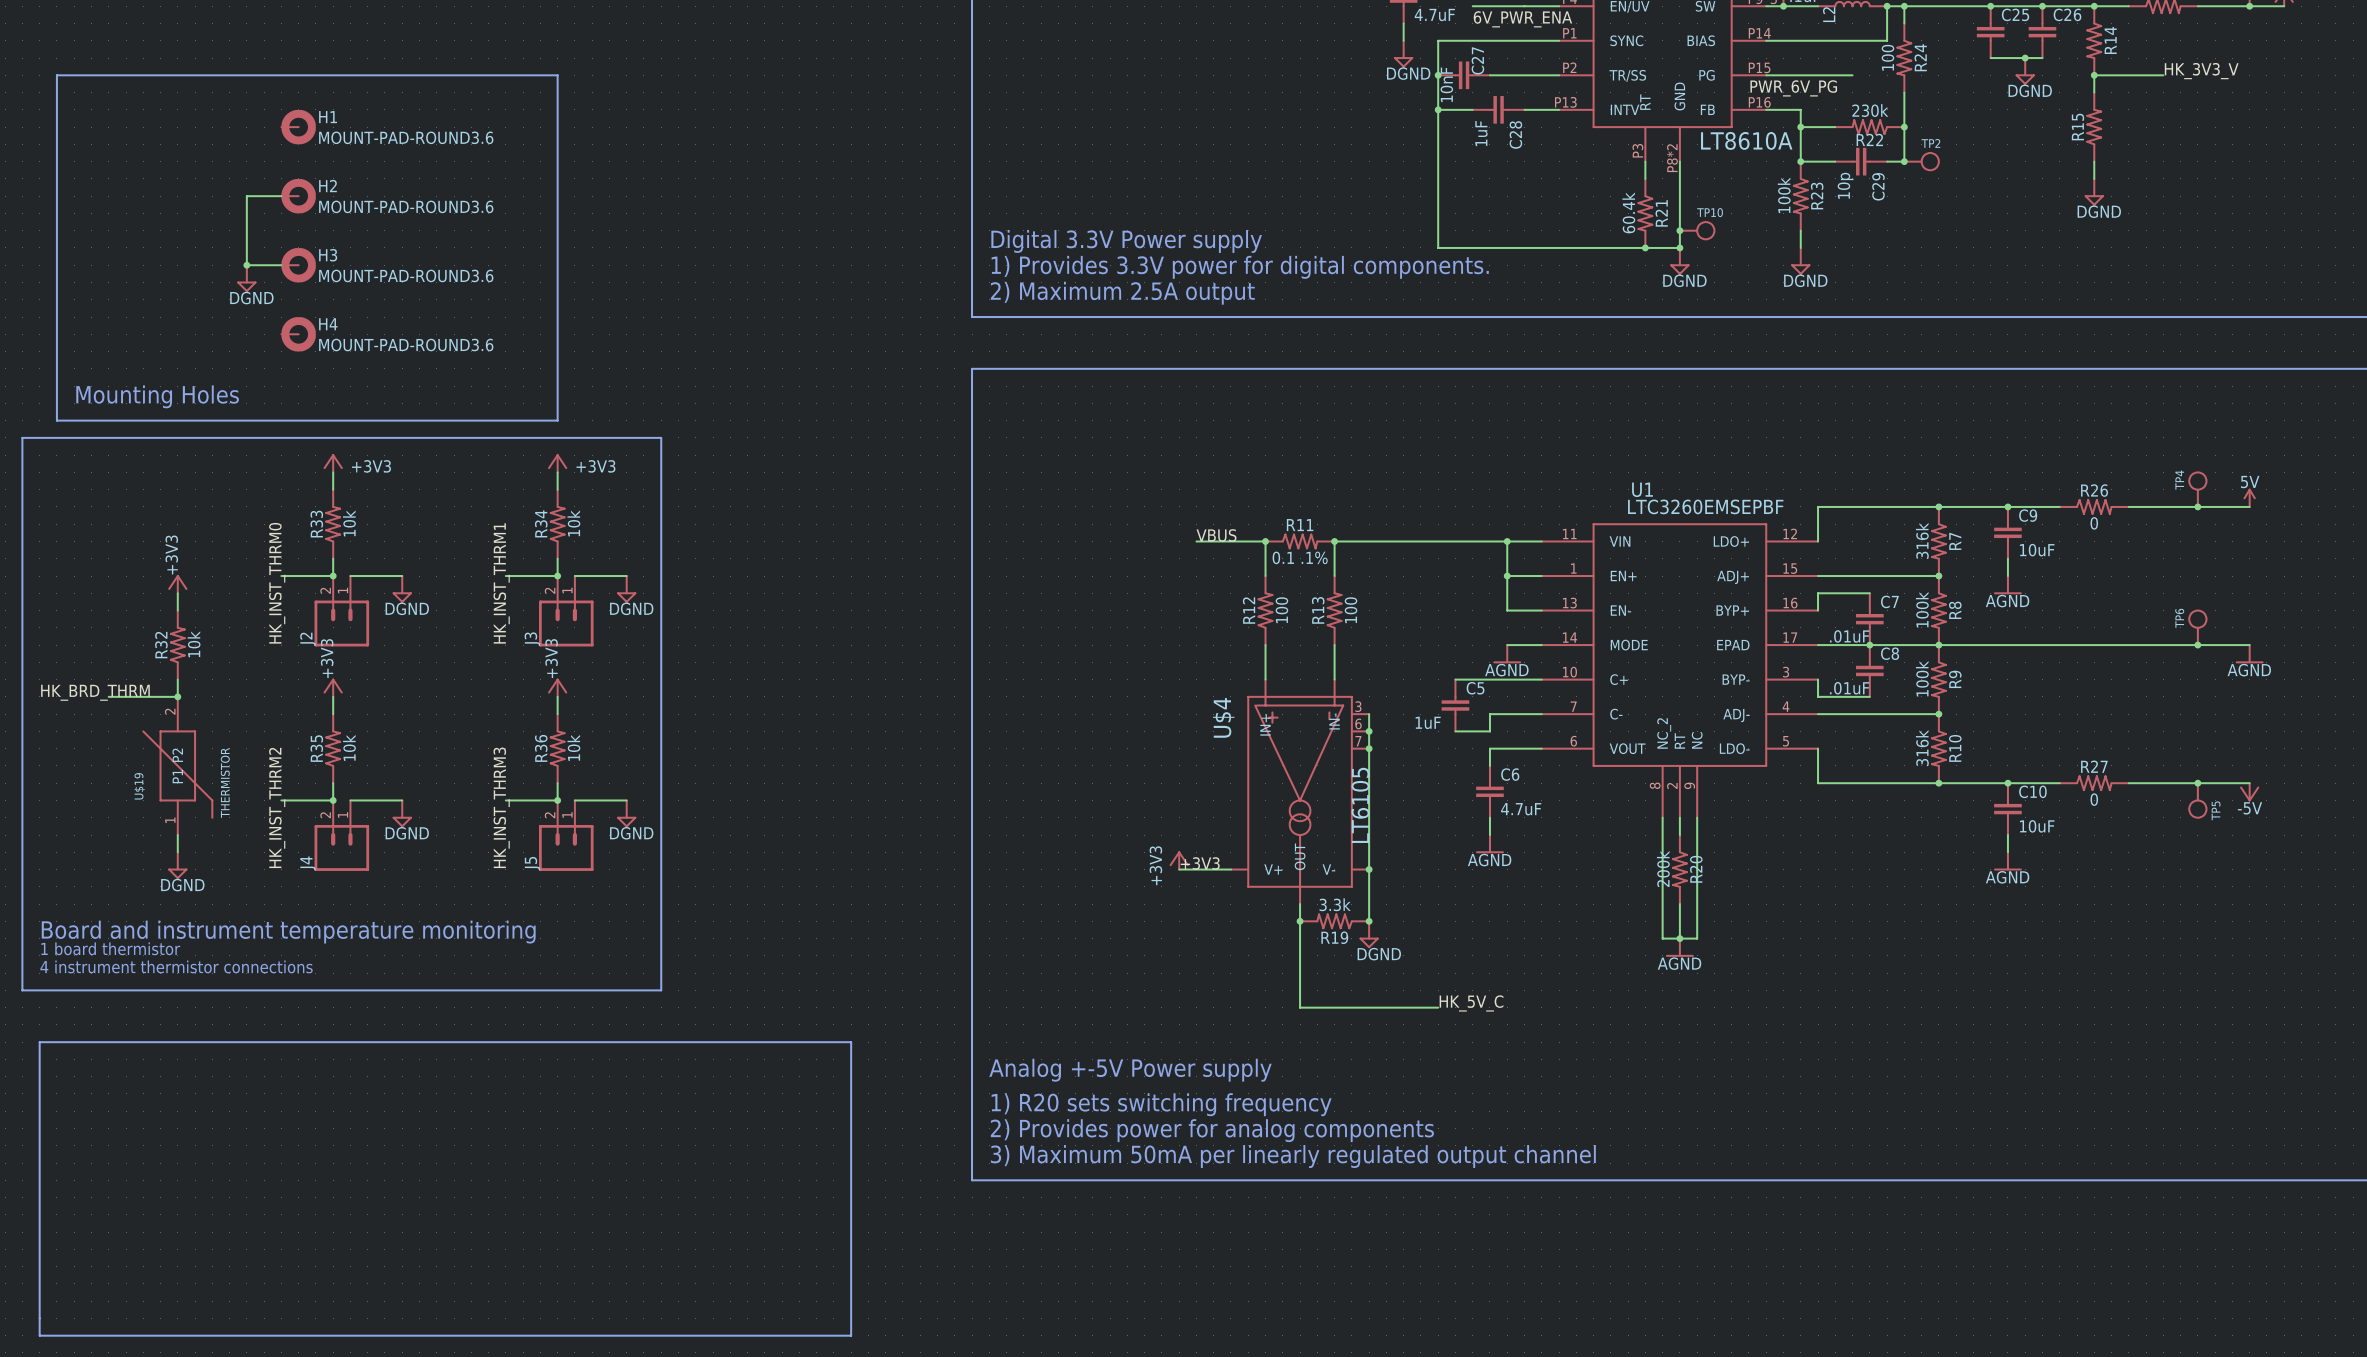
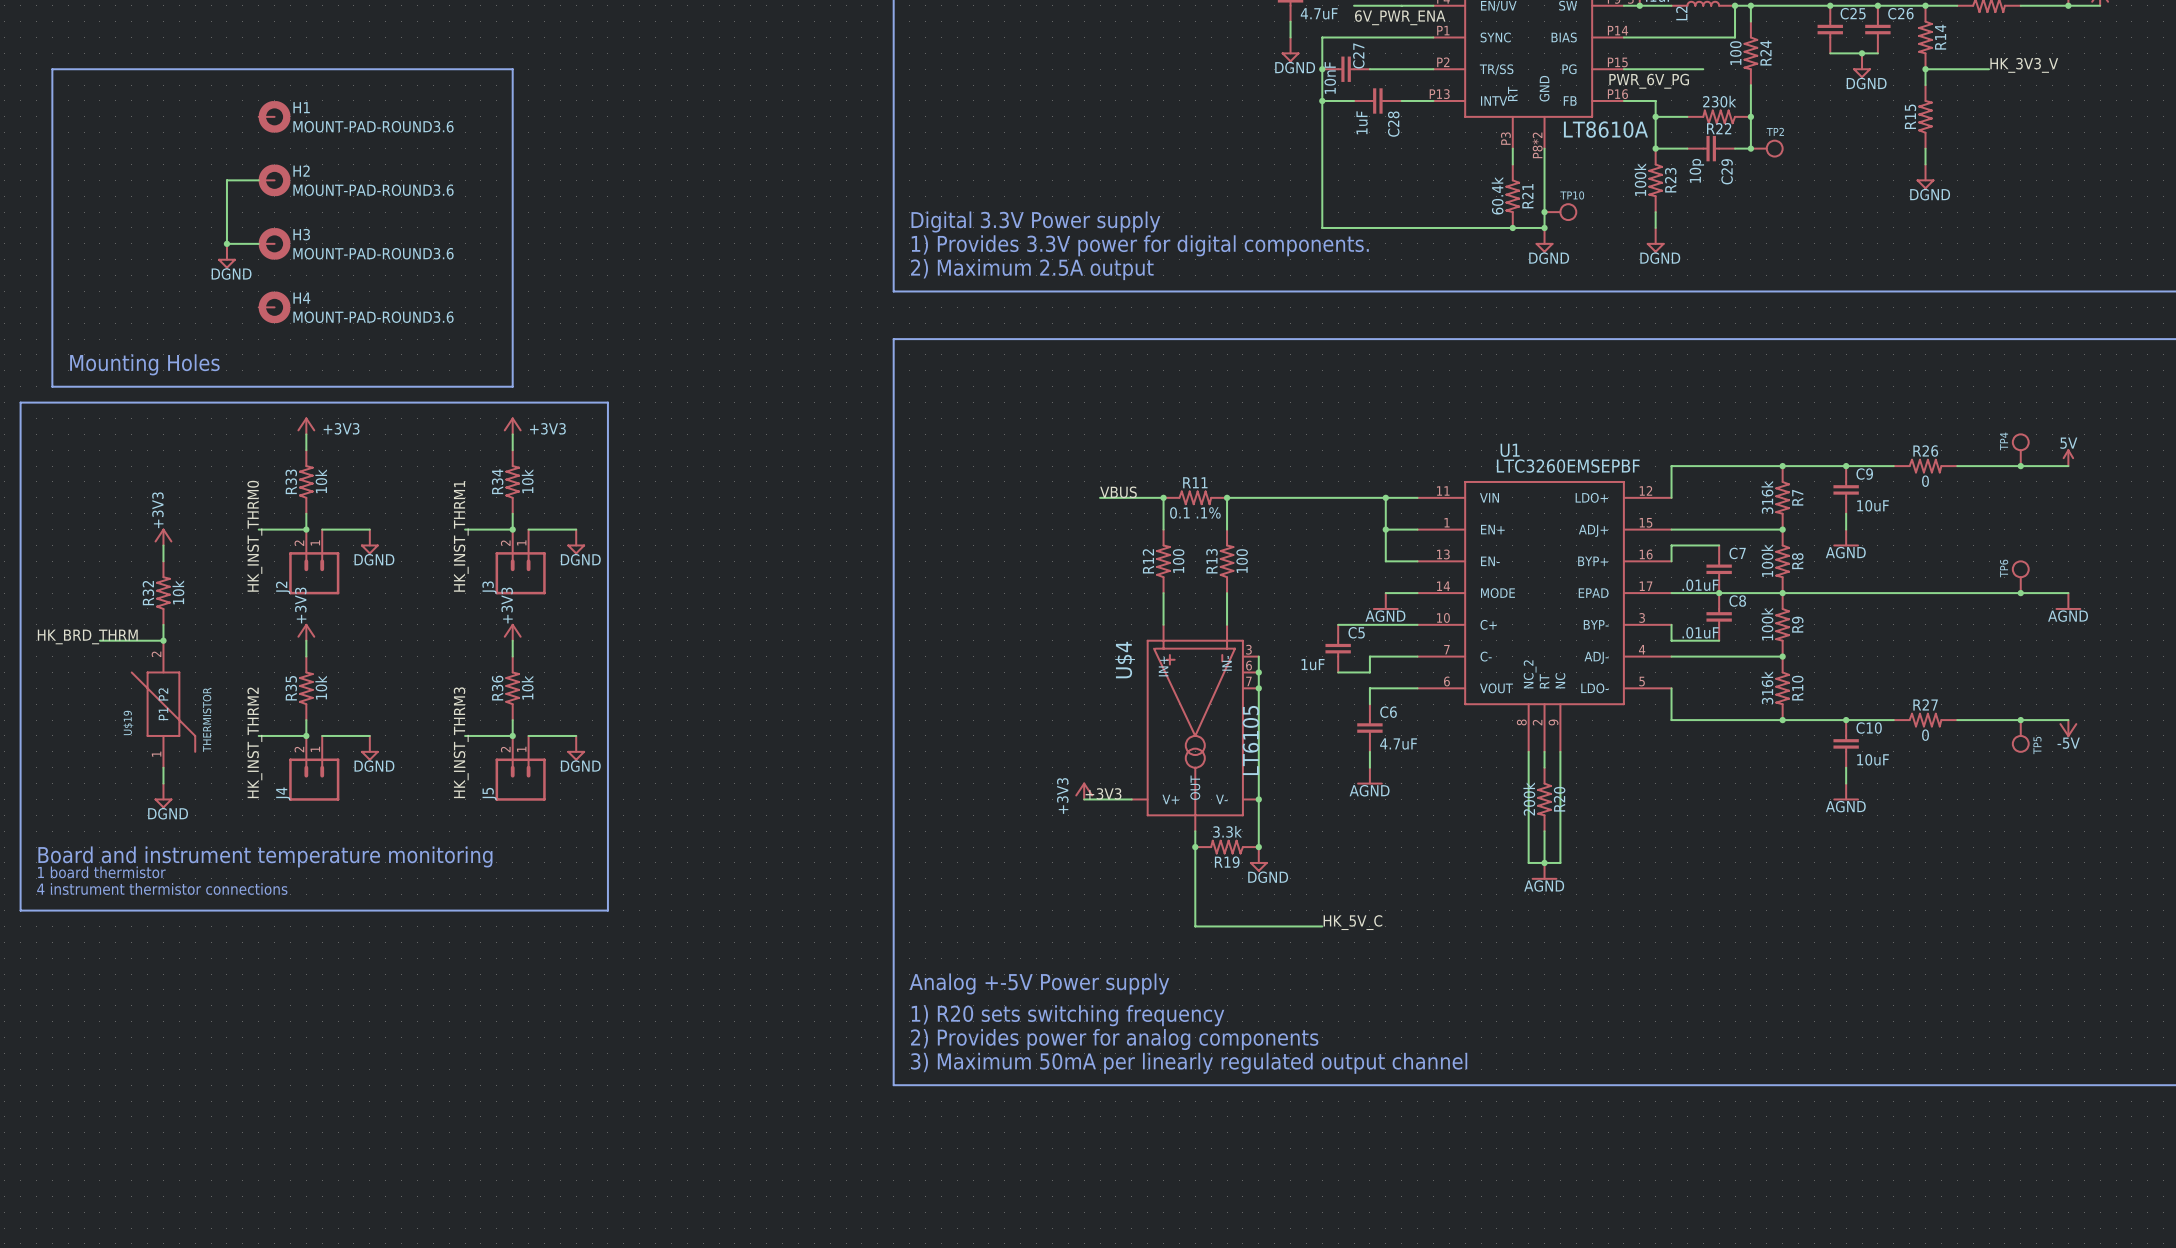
line: (39, 1042) (39, 1335) (851, 1335) (851, 1042) (39, 1042) -> none

